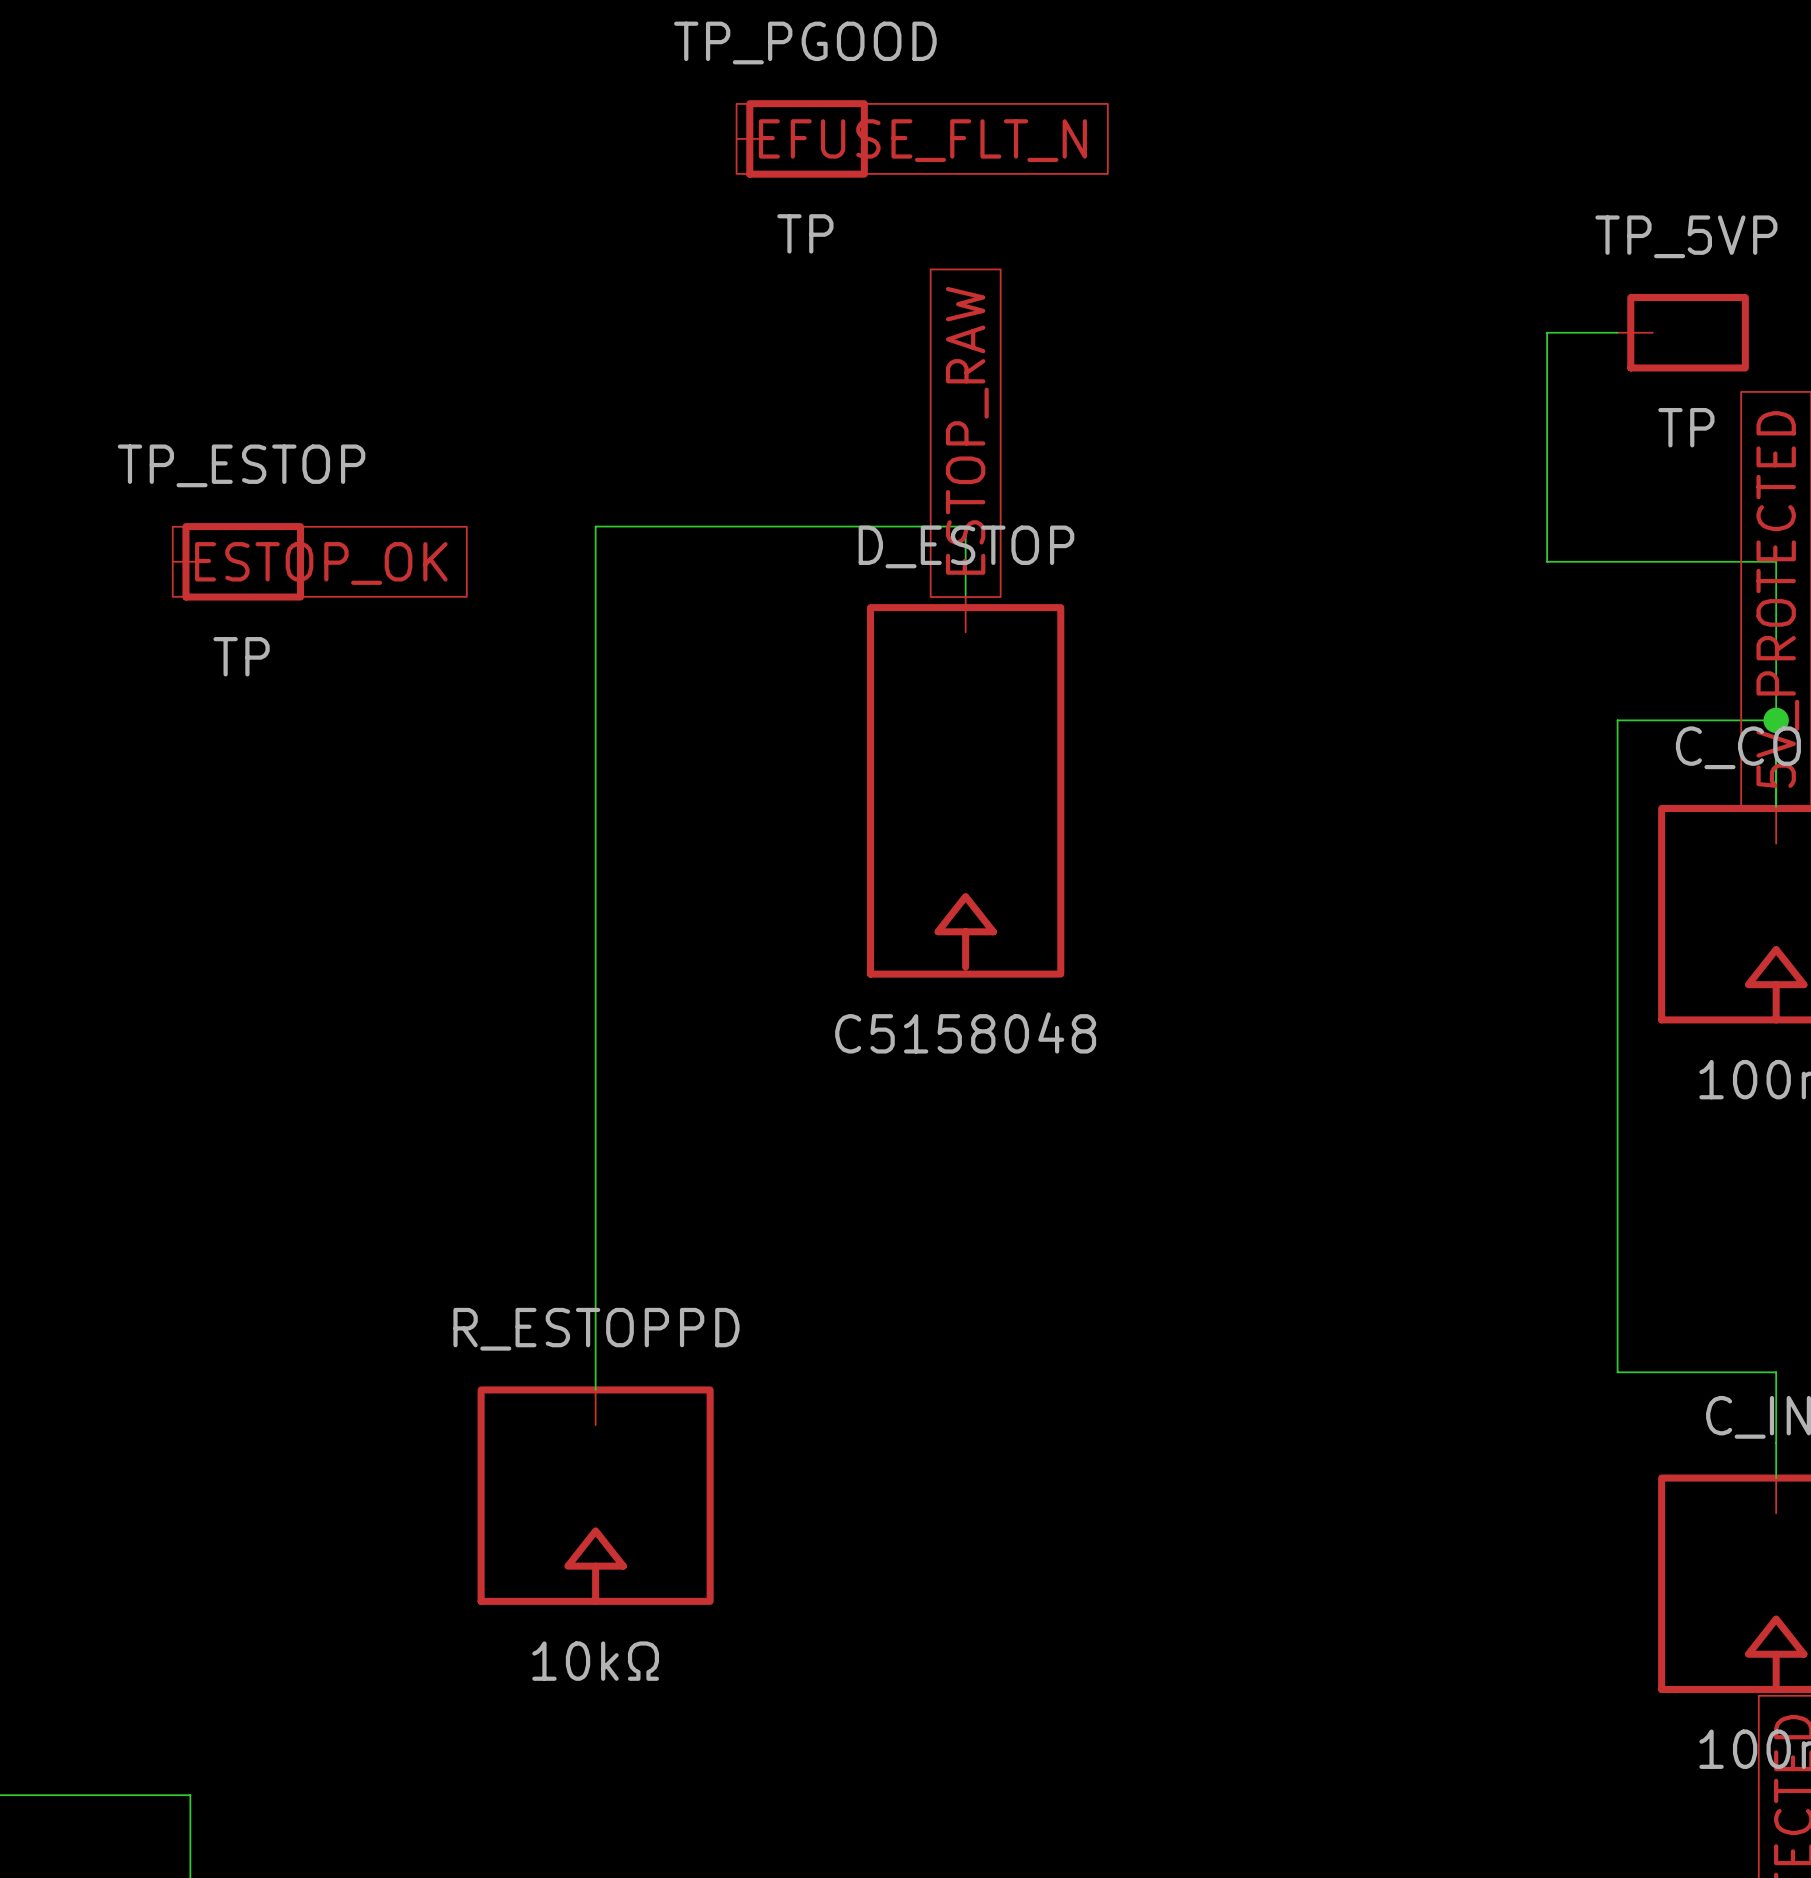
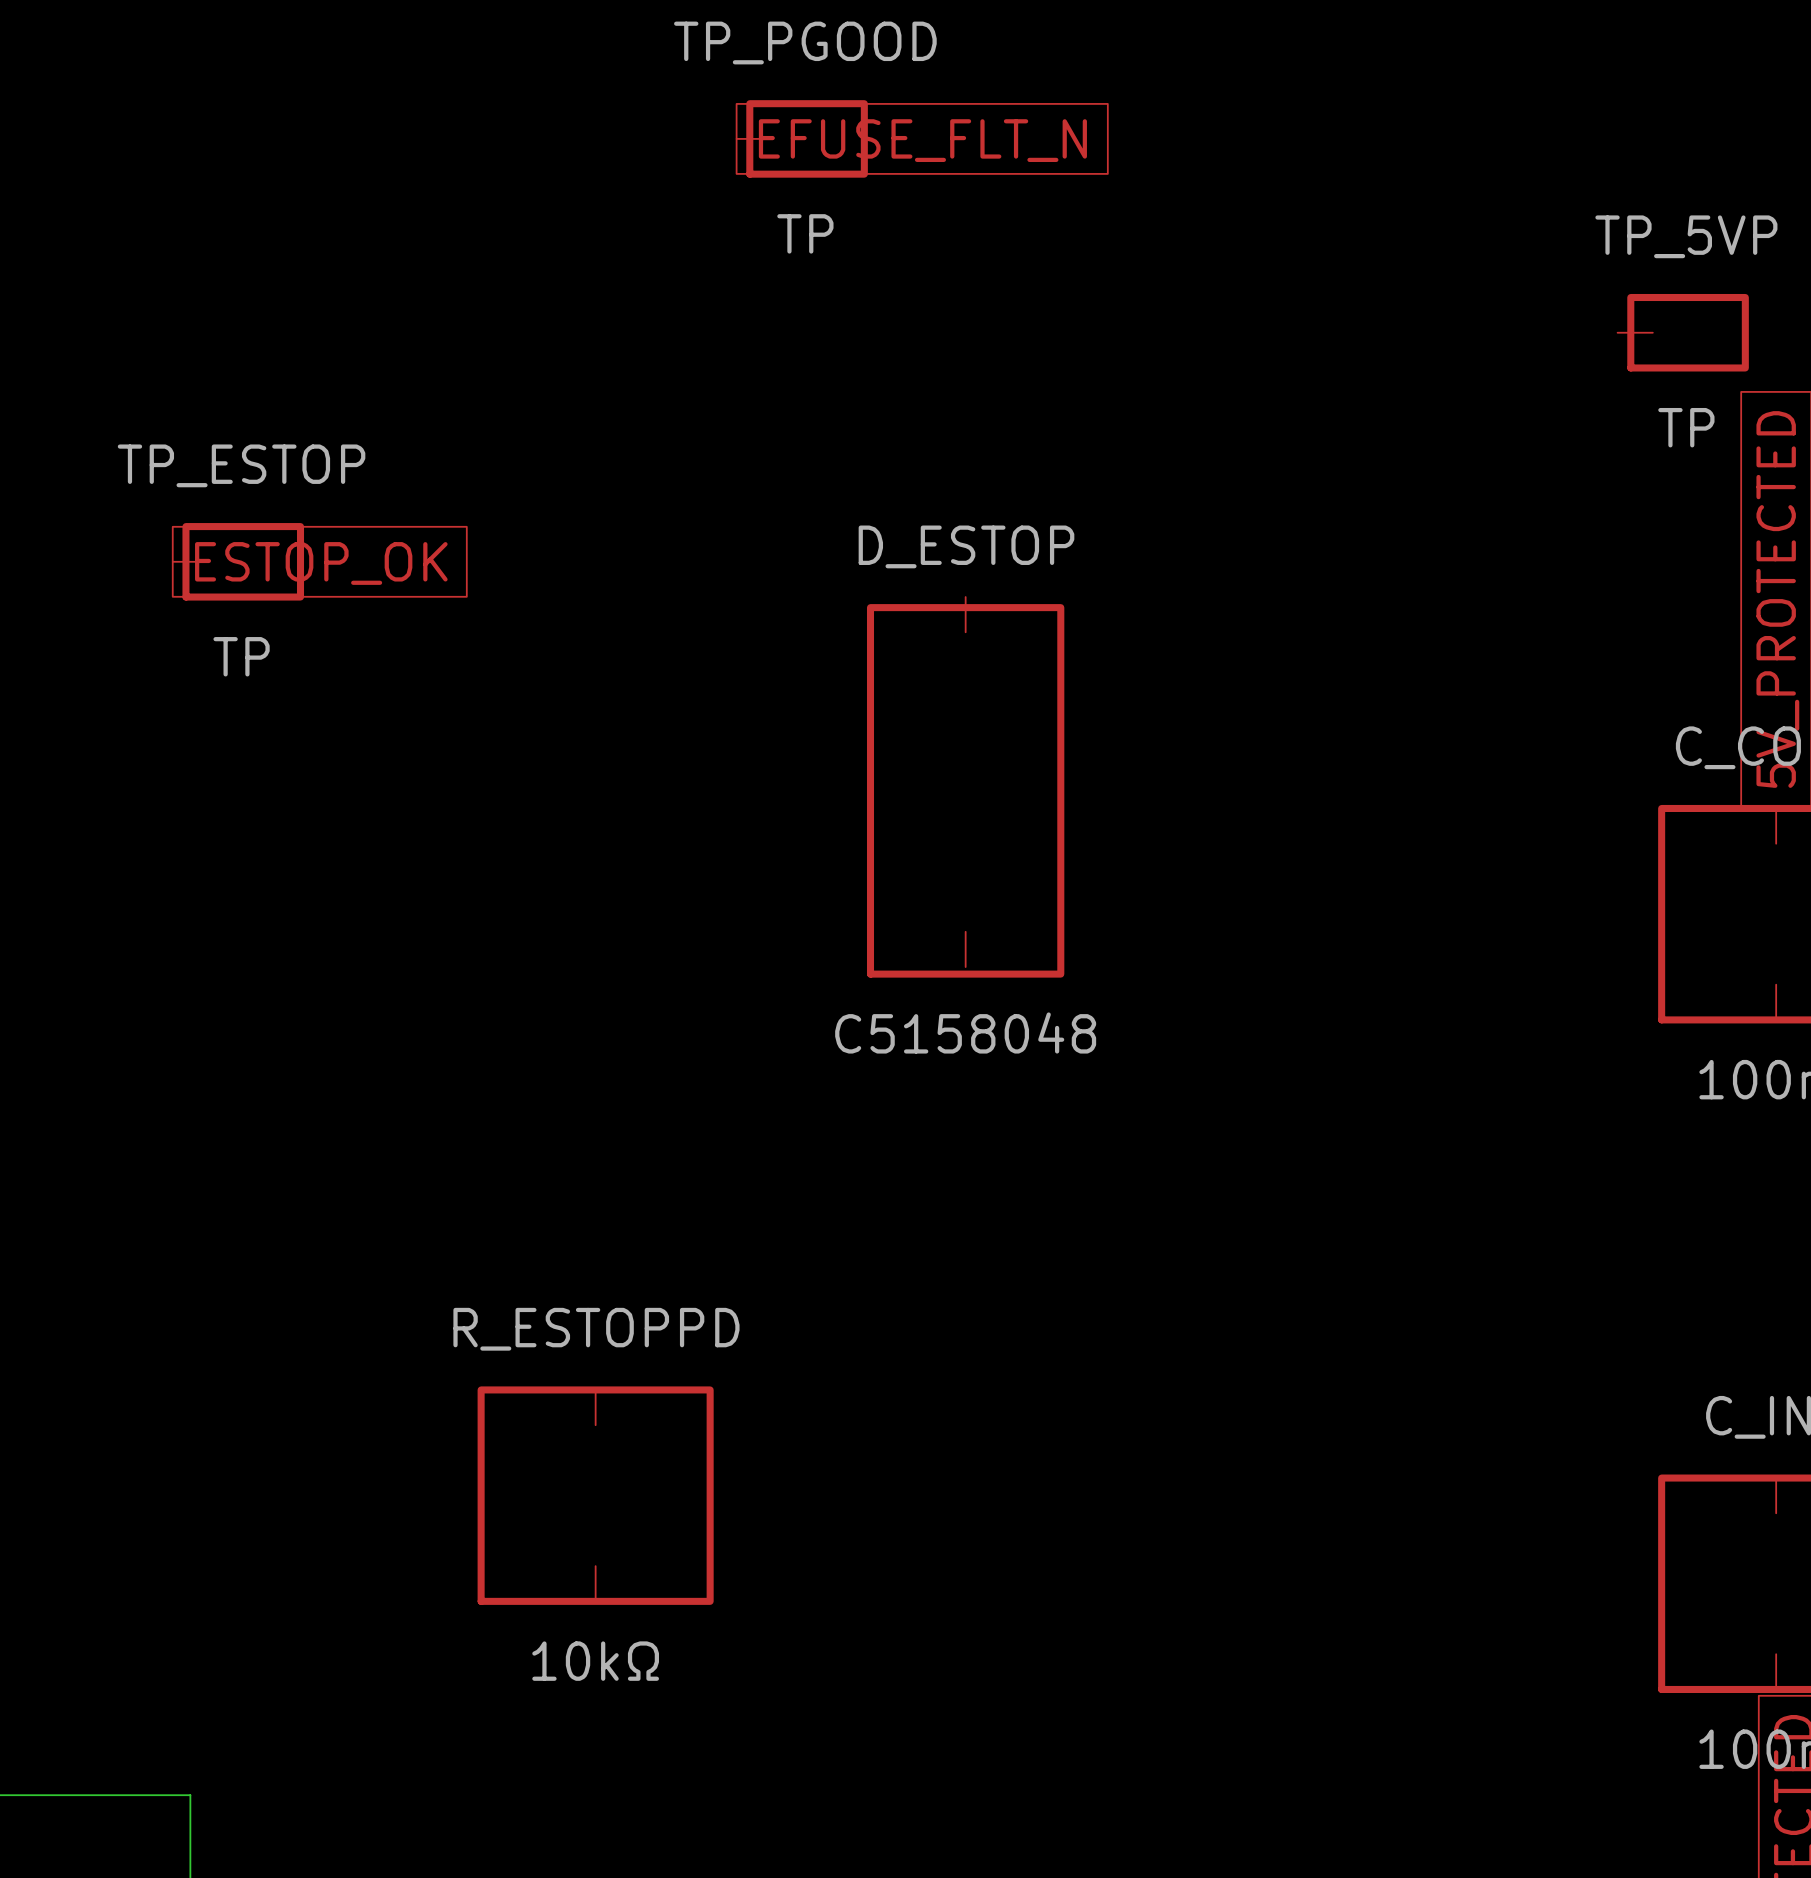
wire: (1617, 332) (1547, 332) (1547, 561) (1776, 561) (1776, 808) -> none
global label: ESTOP_RAW (967, 430) -> none
wire: (965, 597) (965, 526) (595, 526) (595, 1389) -> none
wire: (1776, 720) (1617, 720) (1617, 1372) (1776, 1372) (1776, 1478) -> none
junction: (1776, 720) -> none
power symbol: (965, 931) -> none
power symbol: (1776, 984) -> none
power symbol: (595, 1566) -> none
power symbol: (1776, 1654) -> none

